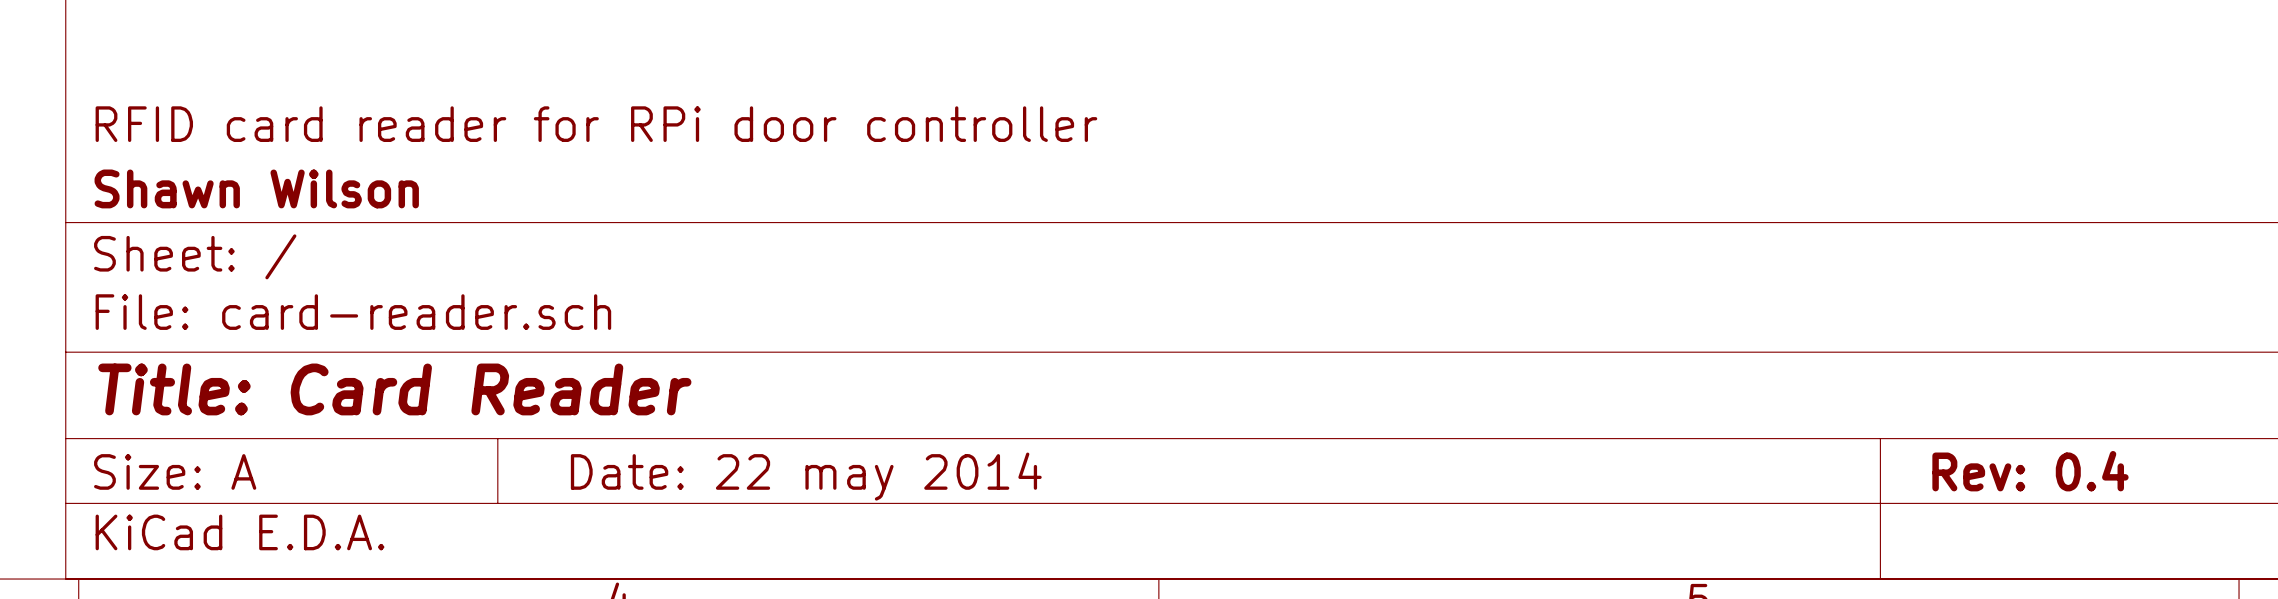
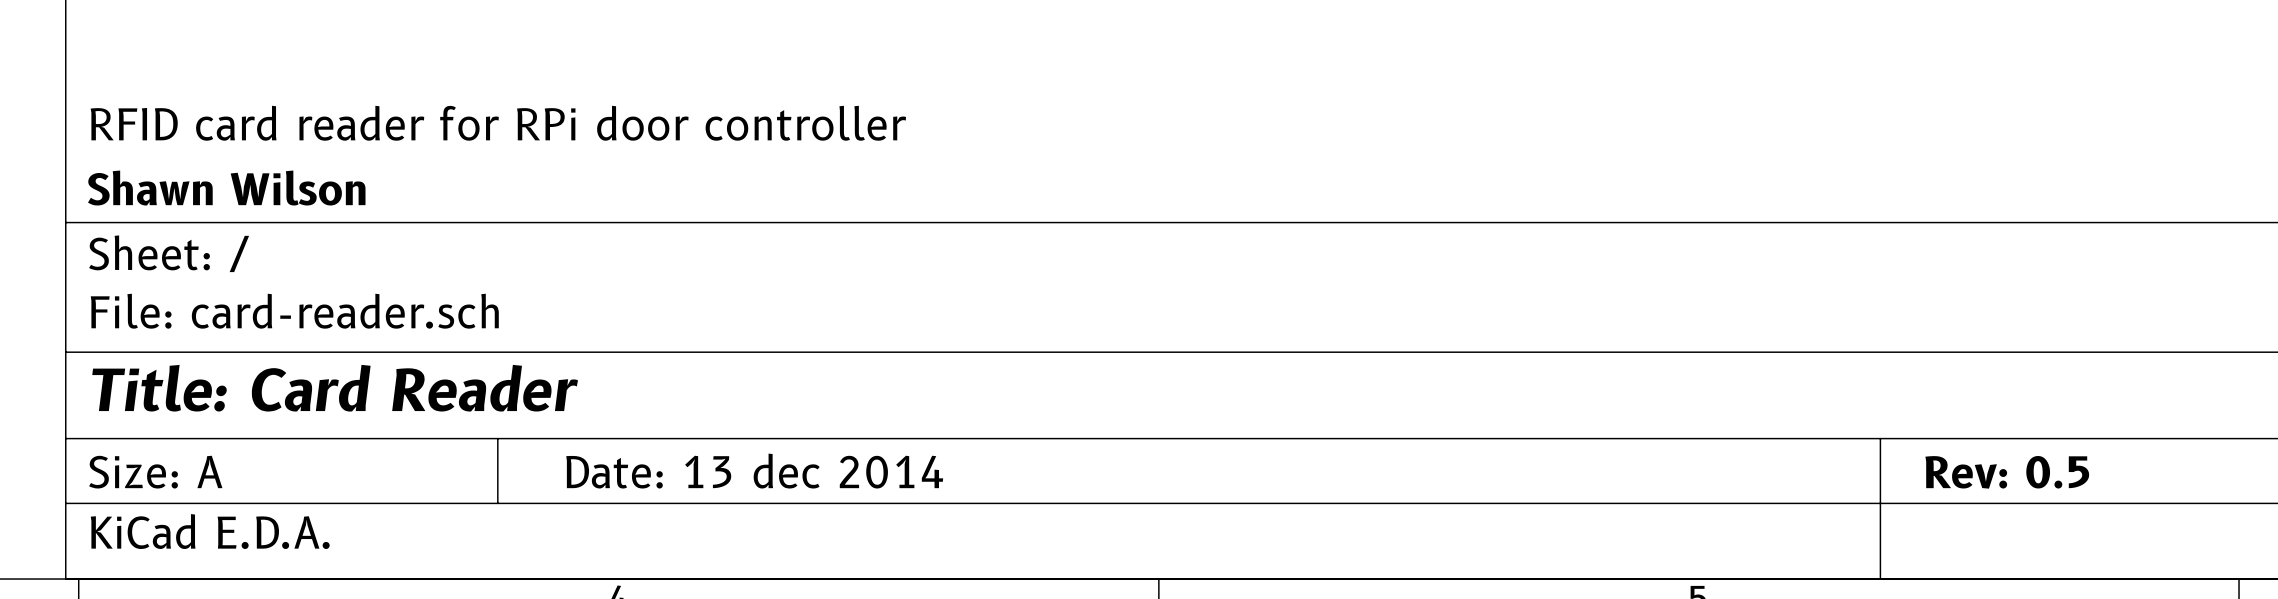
title block: Rev: 0.4 (2030, 471) -> Rev: 0.5 (2007, 472)
title block: Date: 22 may 2014 (806, 476) -> Date: 13 dec 2014 (754, 471)

